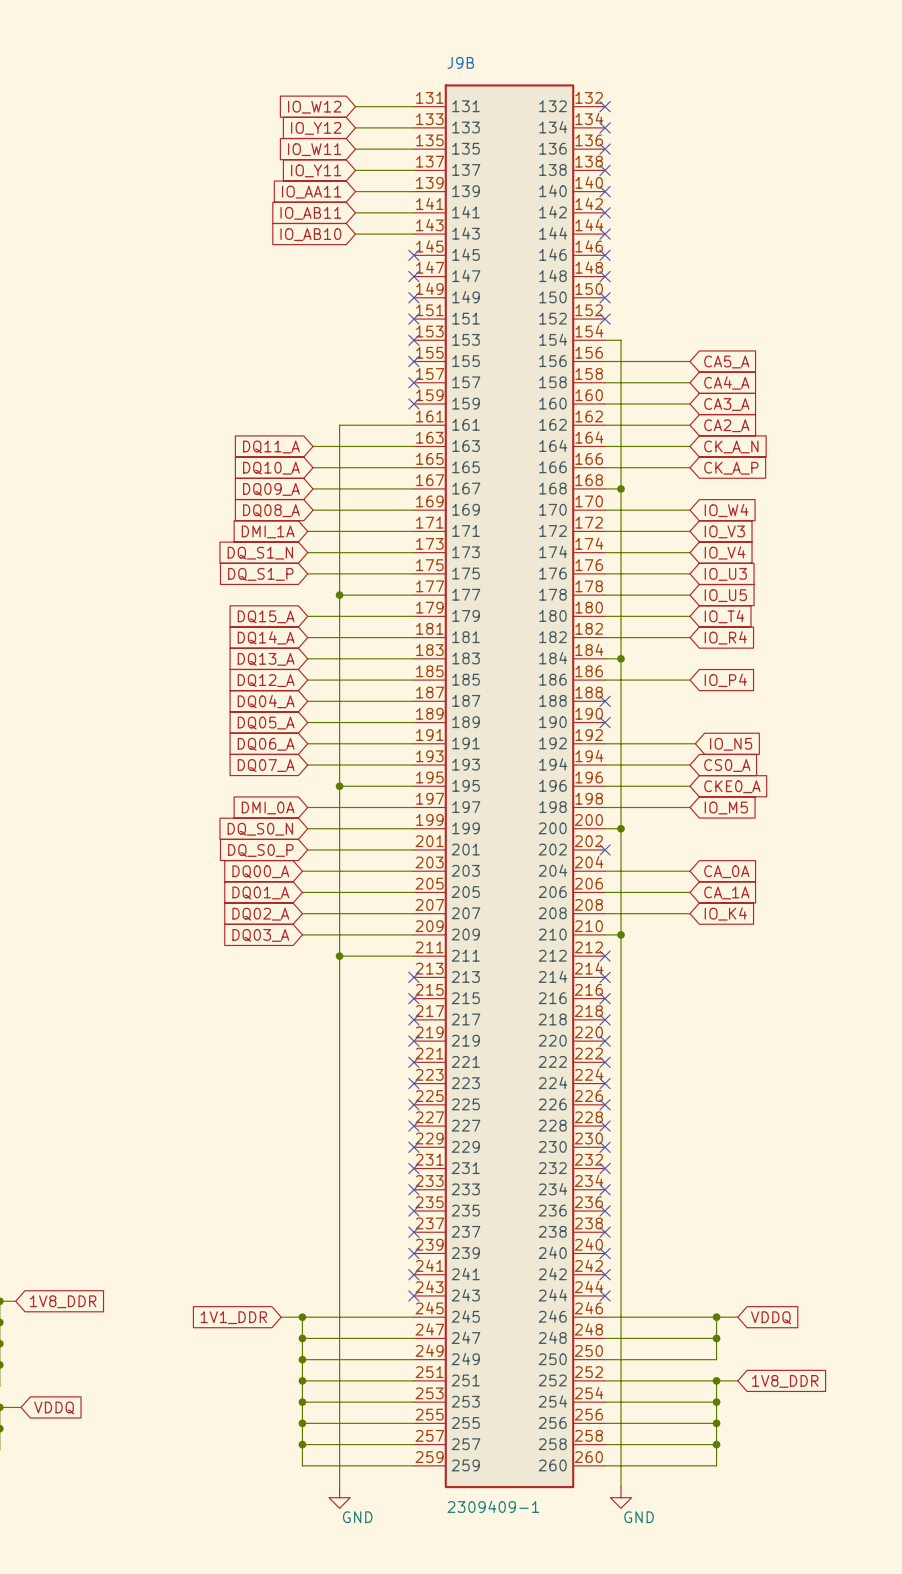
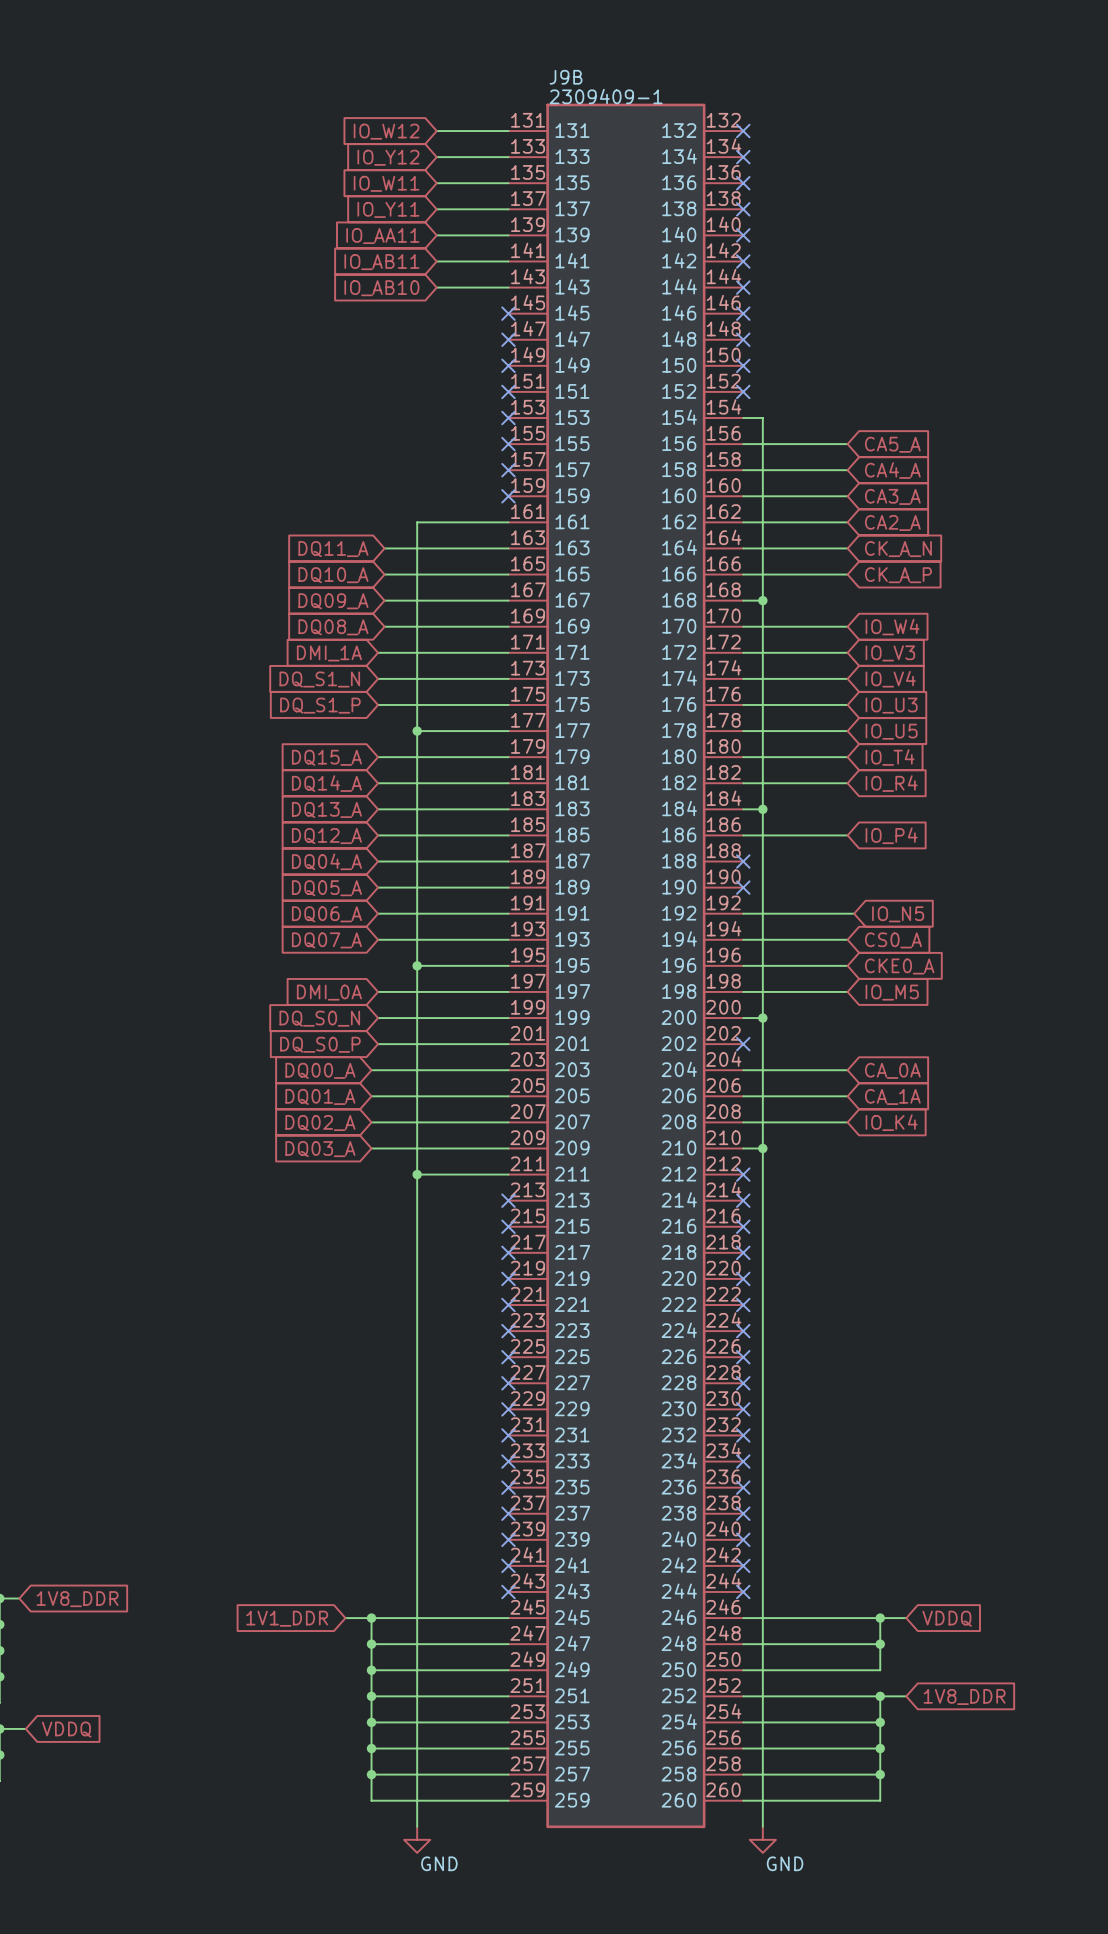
J9B text position: 2309409-1 (493, 1506) -> 2309409-1 (606, 96)

